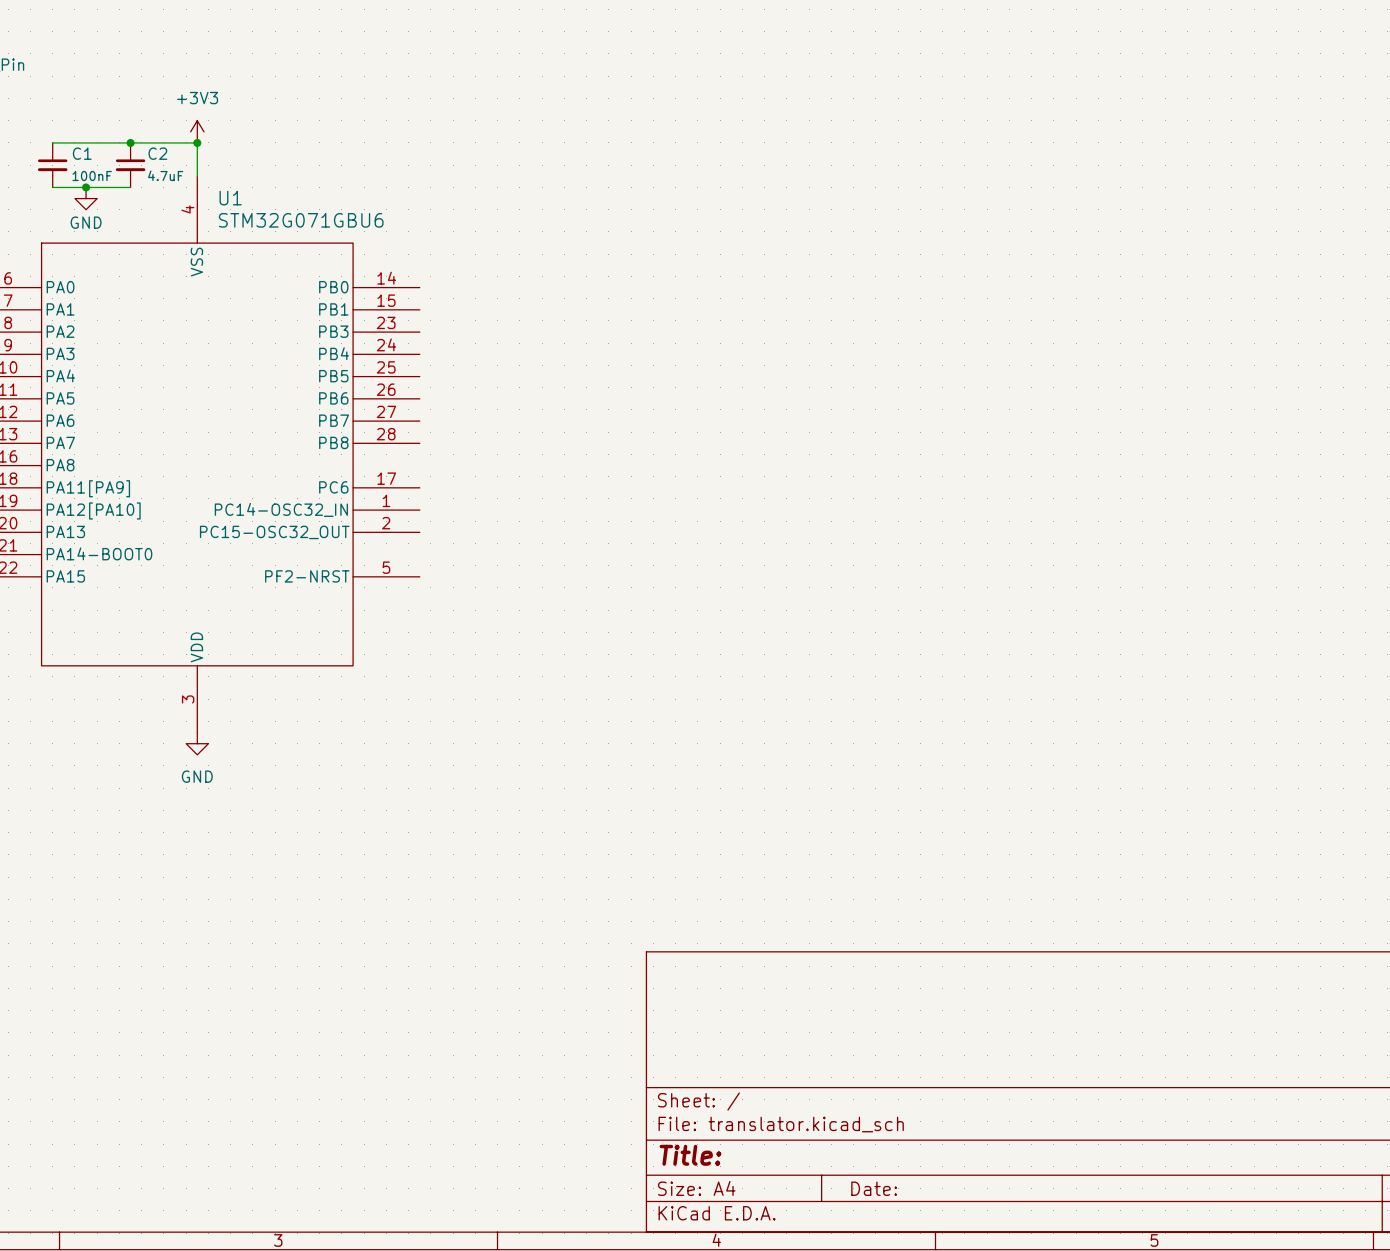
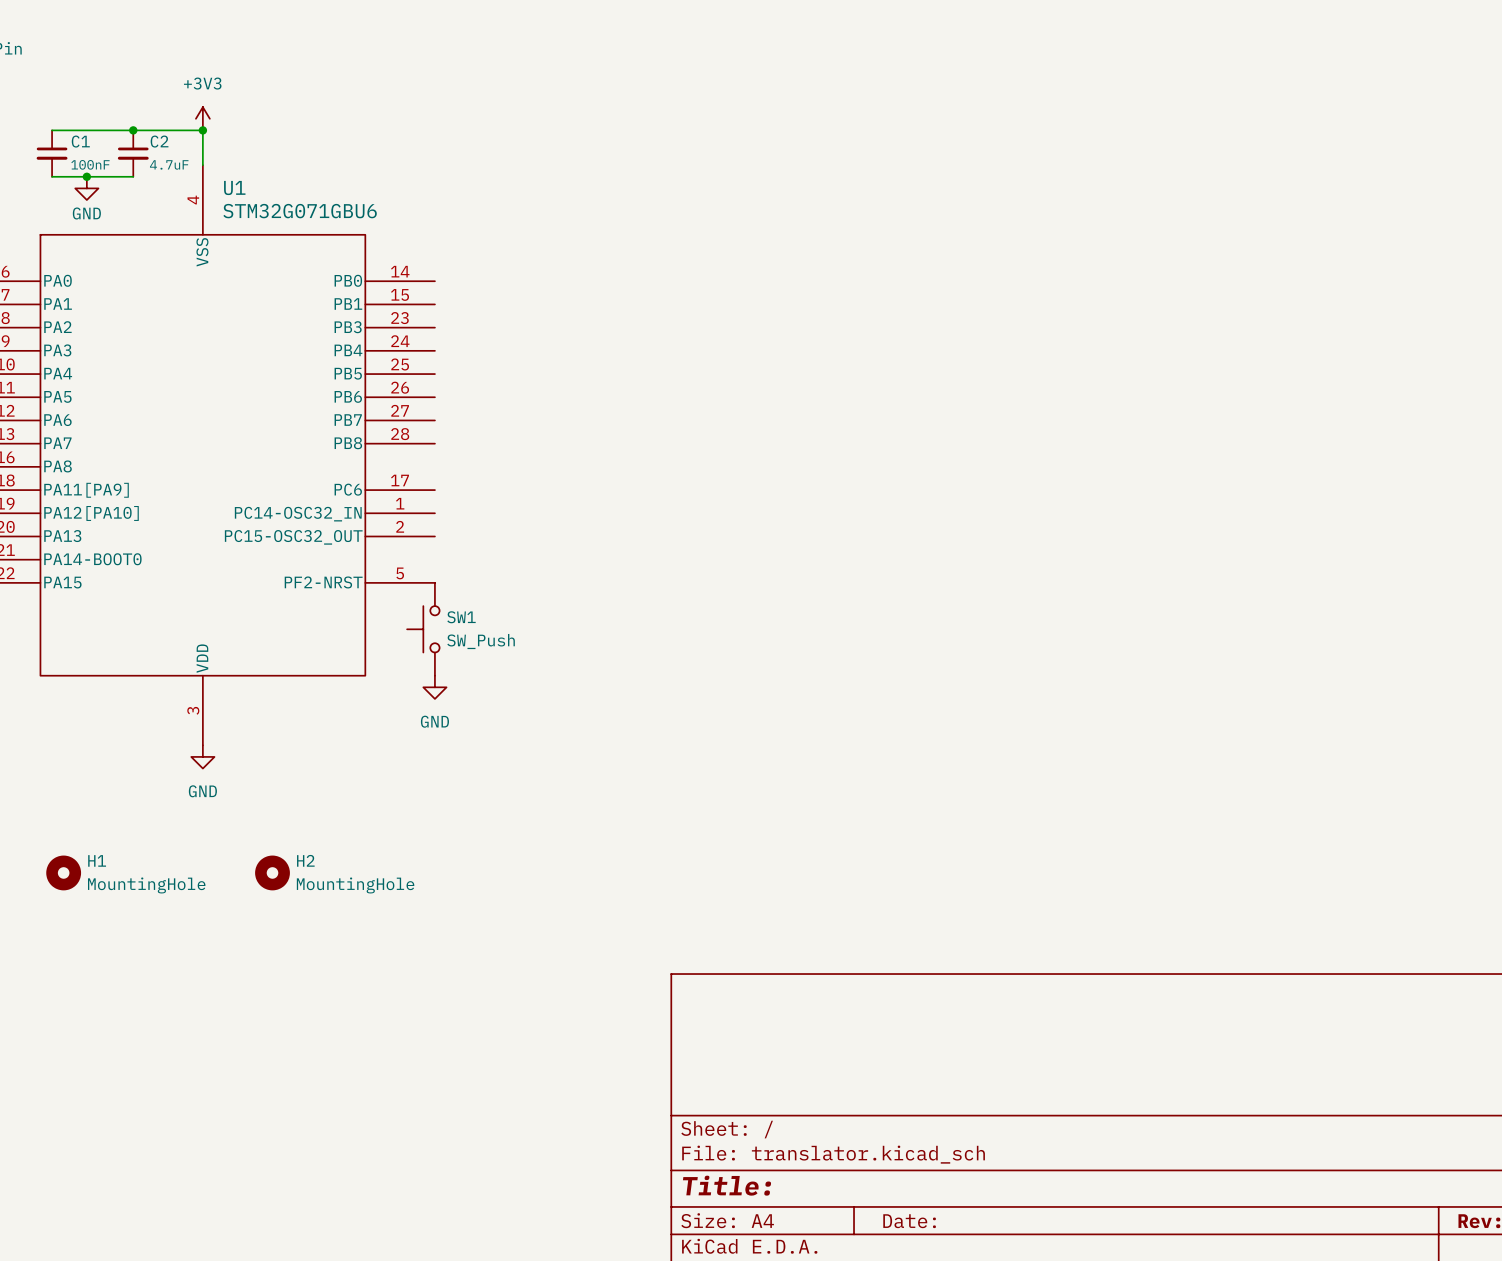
SW1: none -> SW_Push (423, 629)
power symbol: none -> GND (434, 687)
H1: none -> MountingHole (63, 872)
H2: none -> MountingHole (272, 872)

